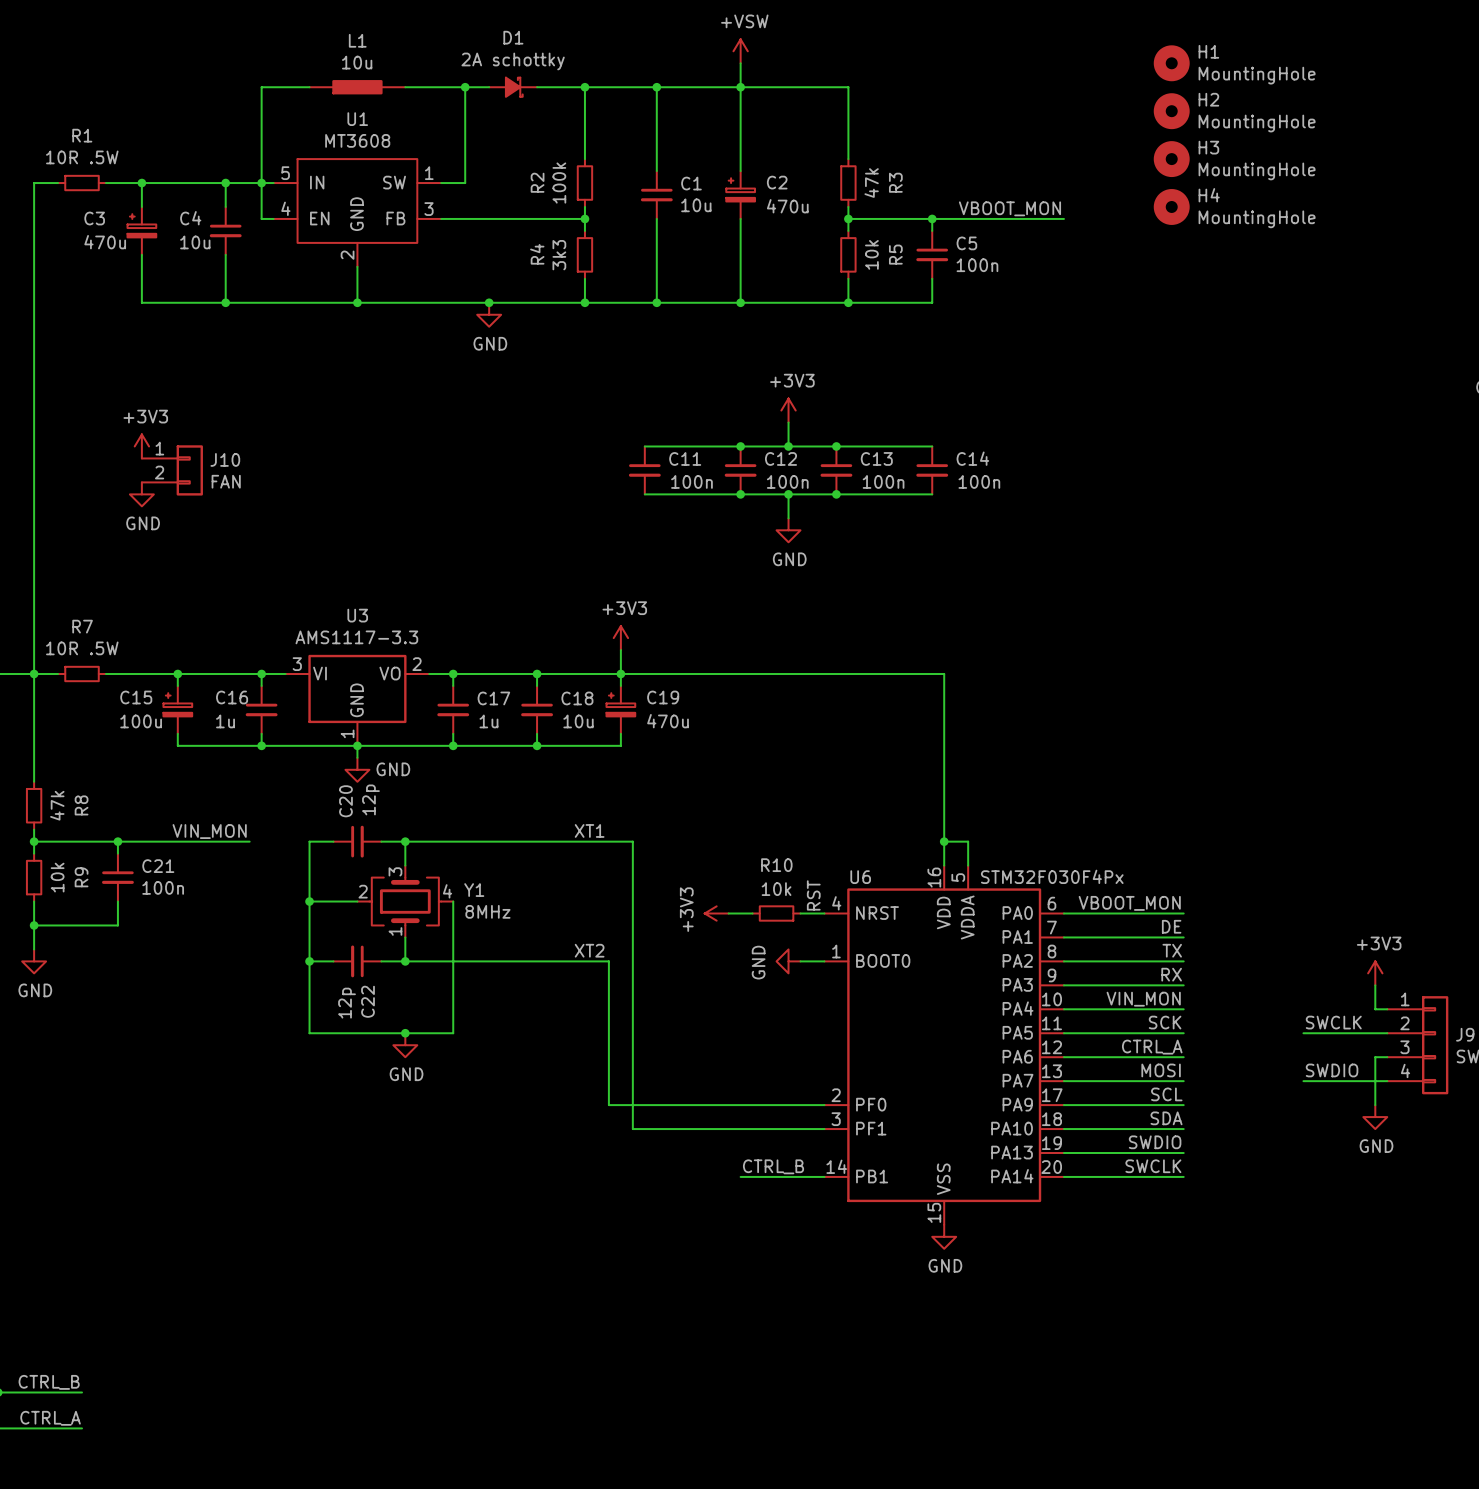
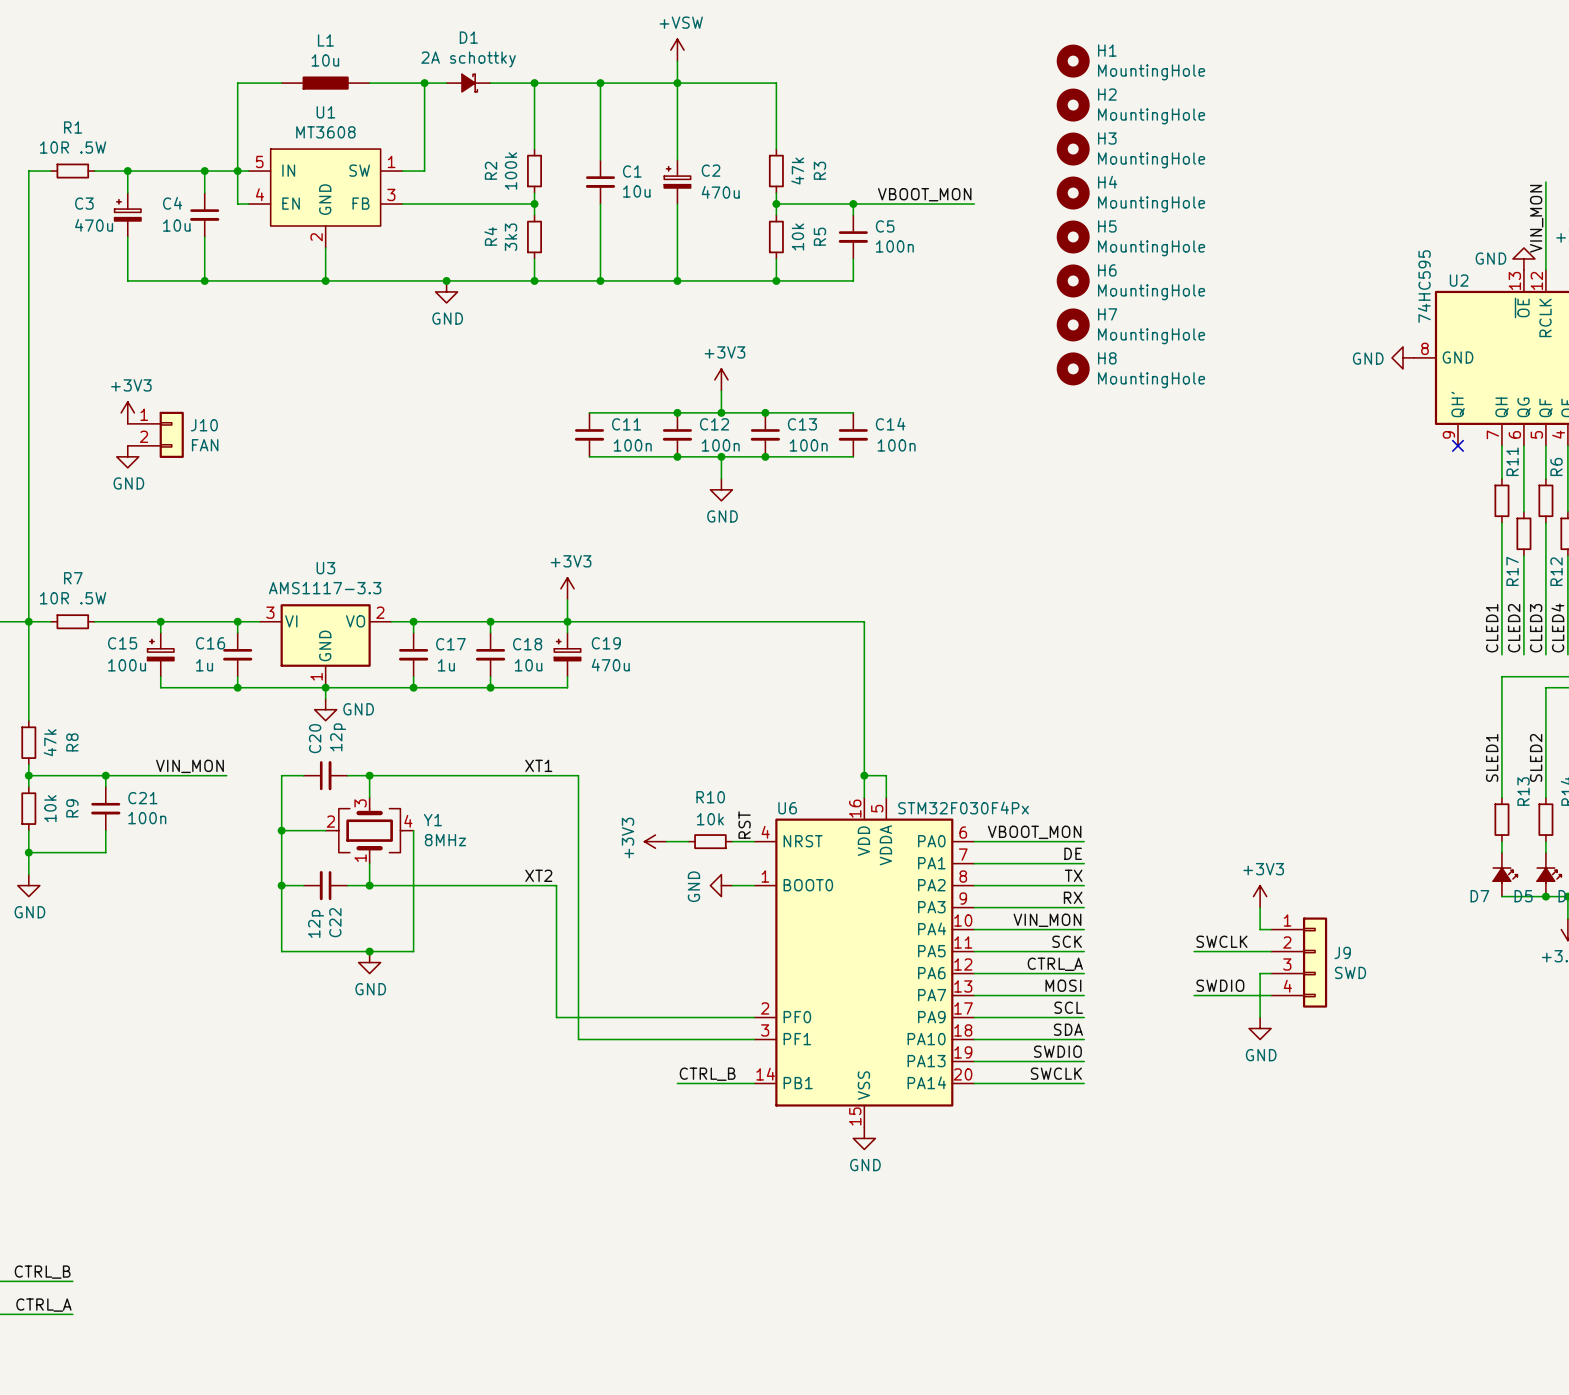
H5: none -> MountingHole (1073, 236)
H6: none -> MountingHole (1073, 280)
H7: none -> MountingHole (1073, 324)
H8: none -> MountingHole (1073, 368)

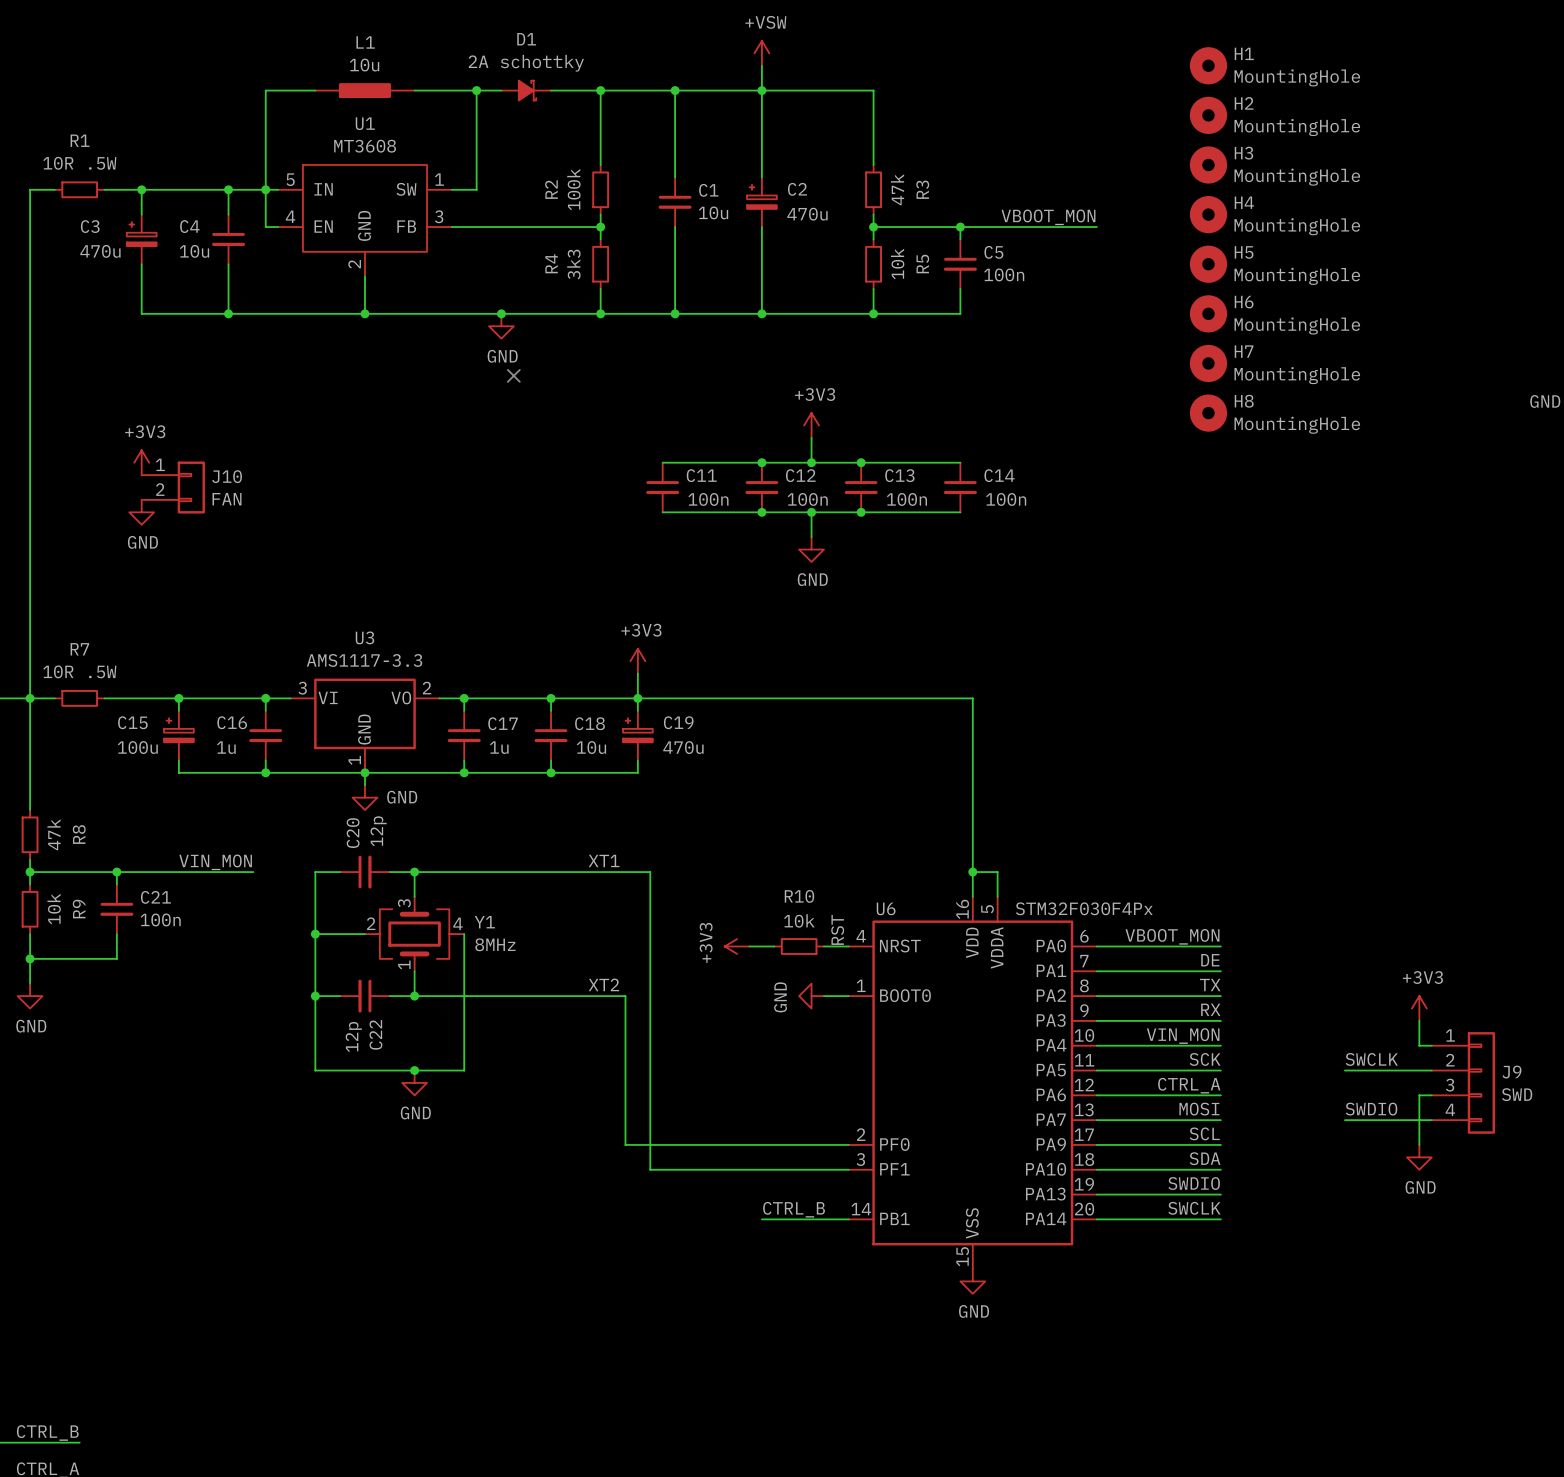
no-connect mark: none -> (513, 375)

